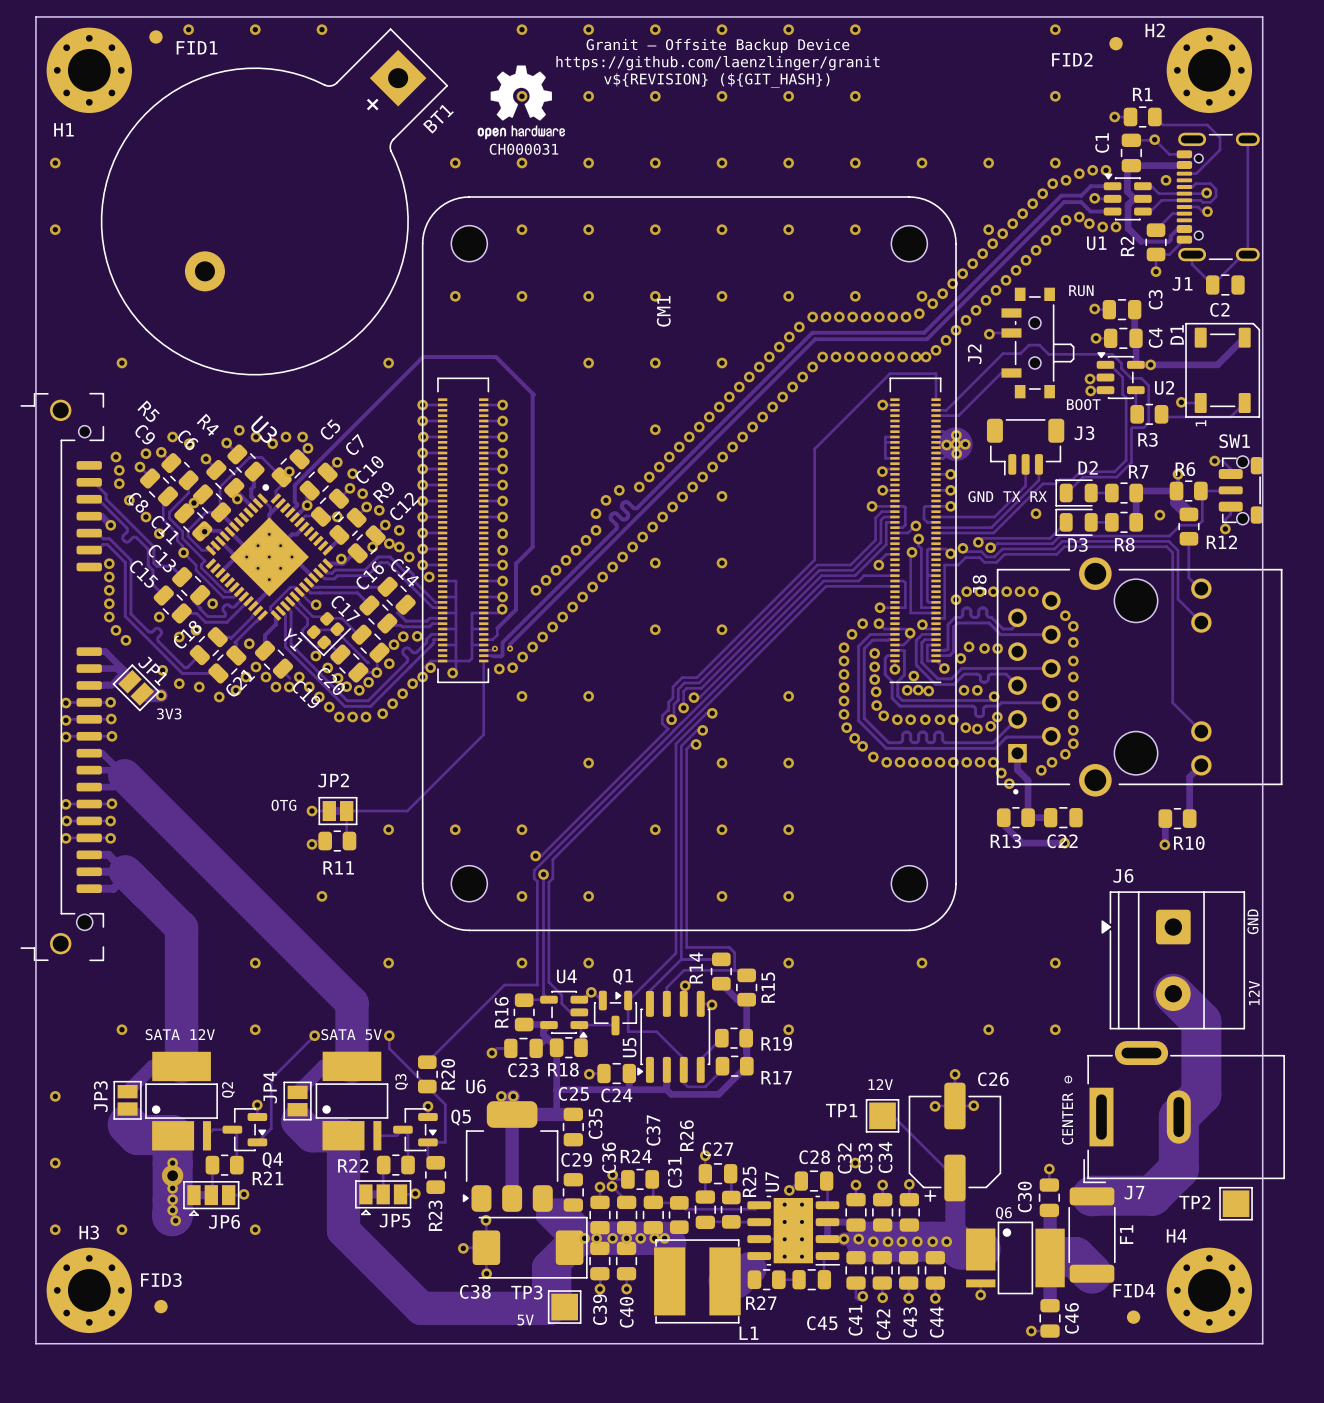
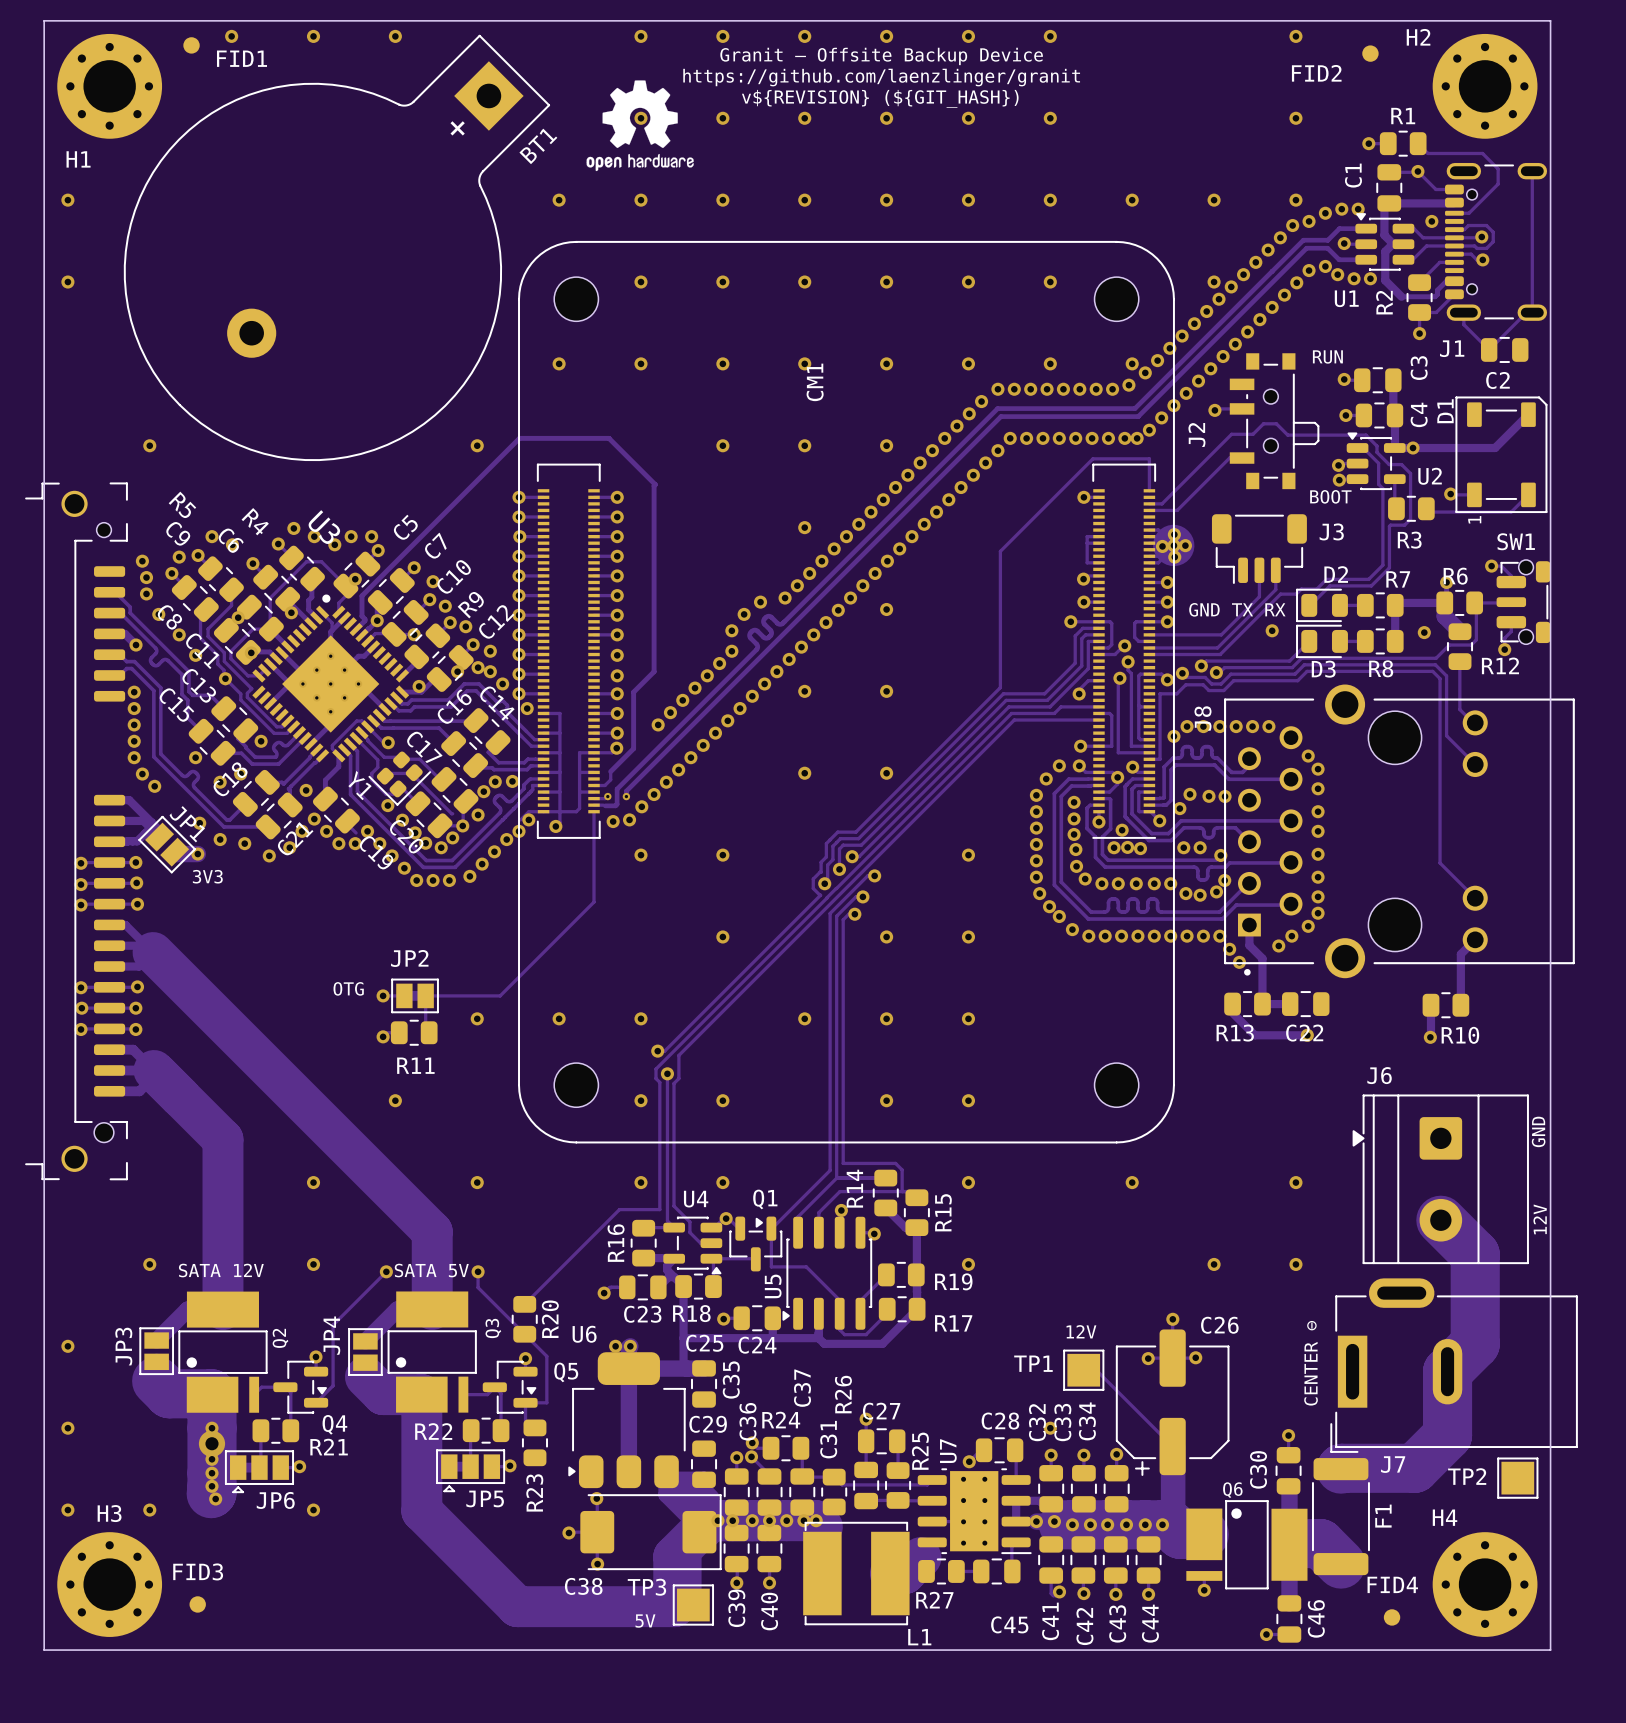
text: CH000031 (523, 149) -> none

